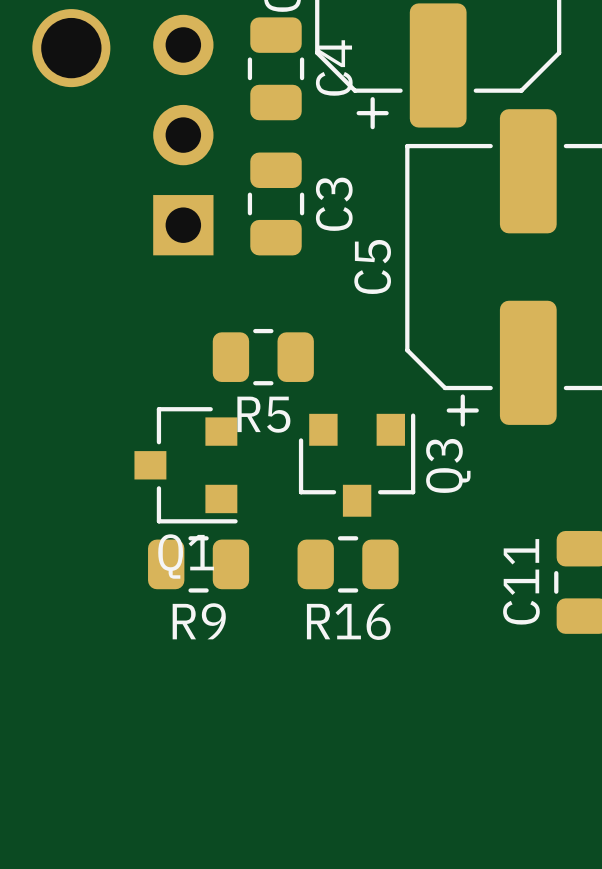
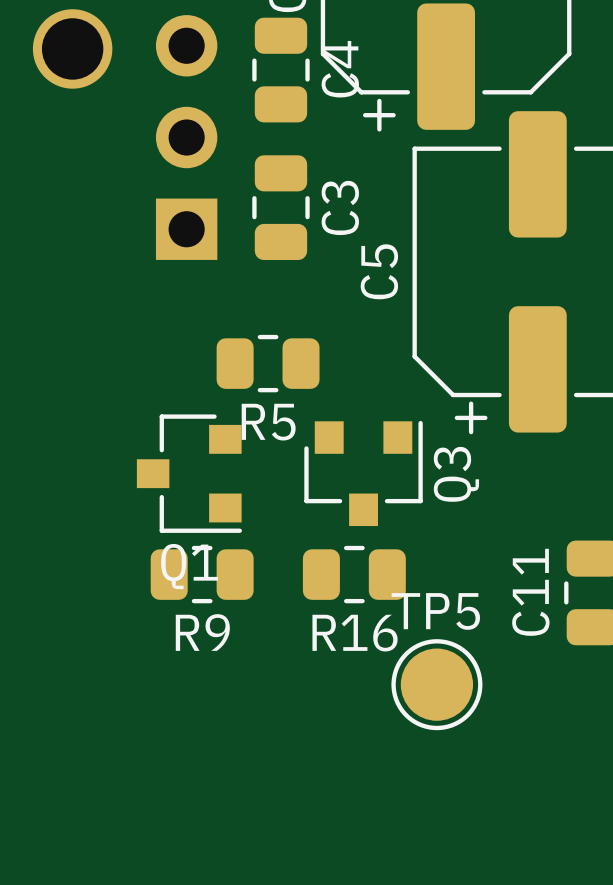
TP5: none -> (436, 684)

